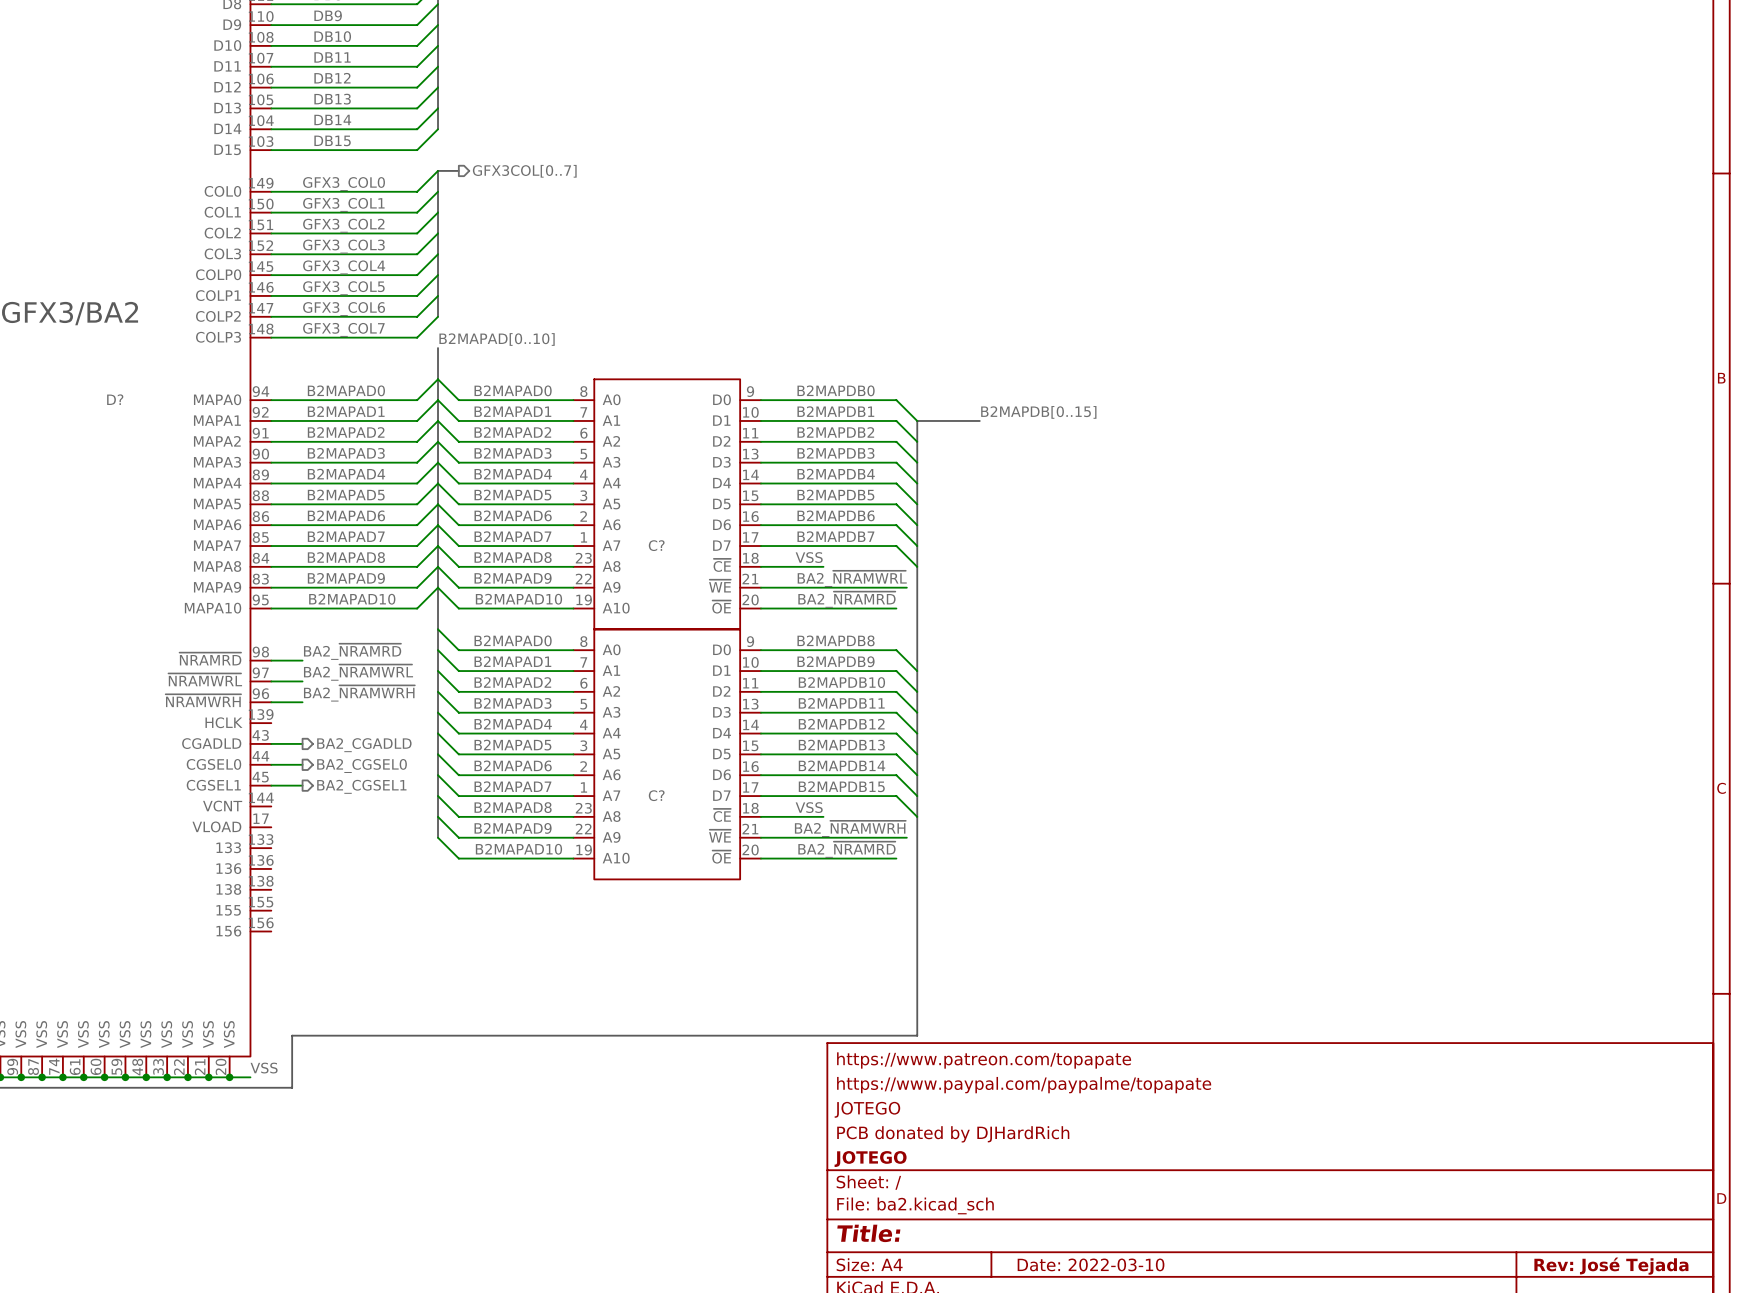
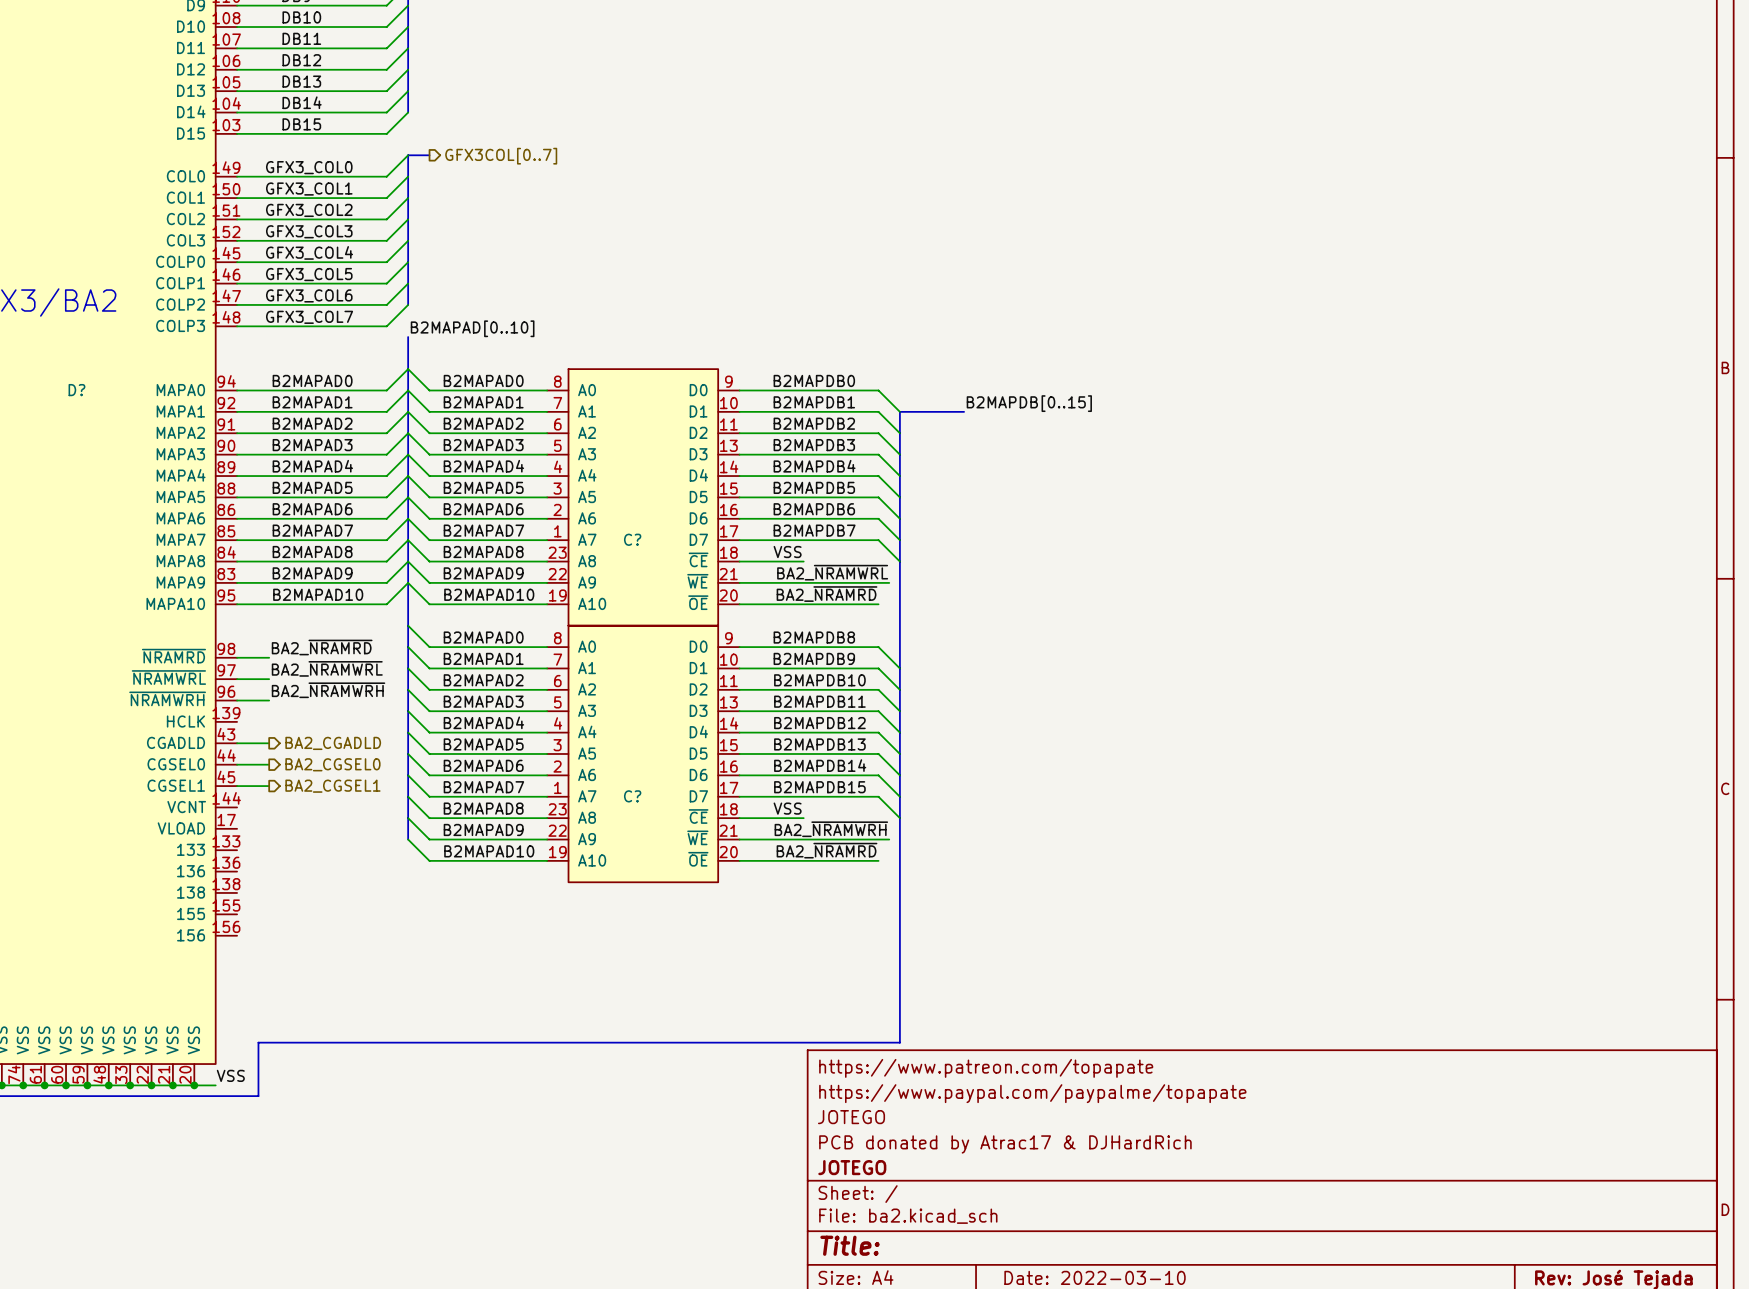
title block: PCB donated by DJHardRich (953, 1134) -> PCB donated by Atrac17 & DJHardRich (1005, 1144)

